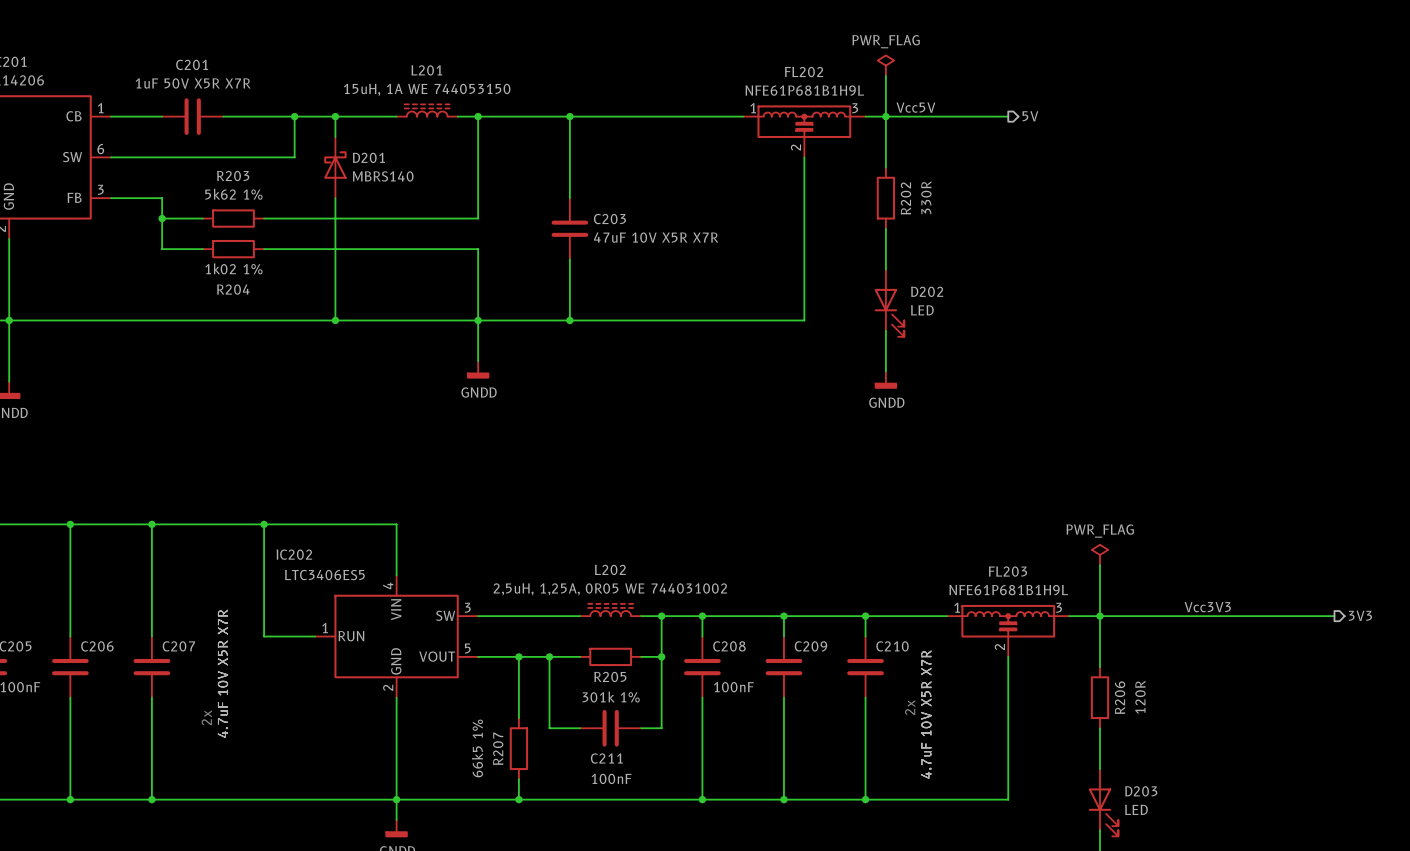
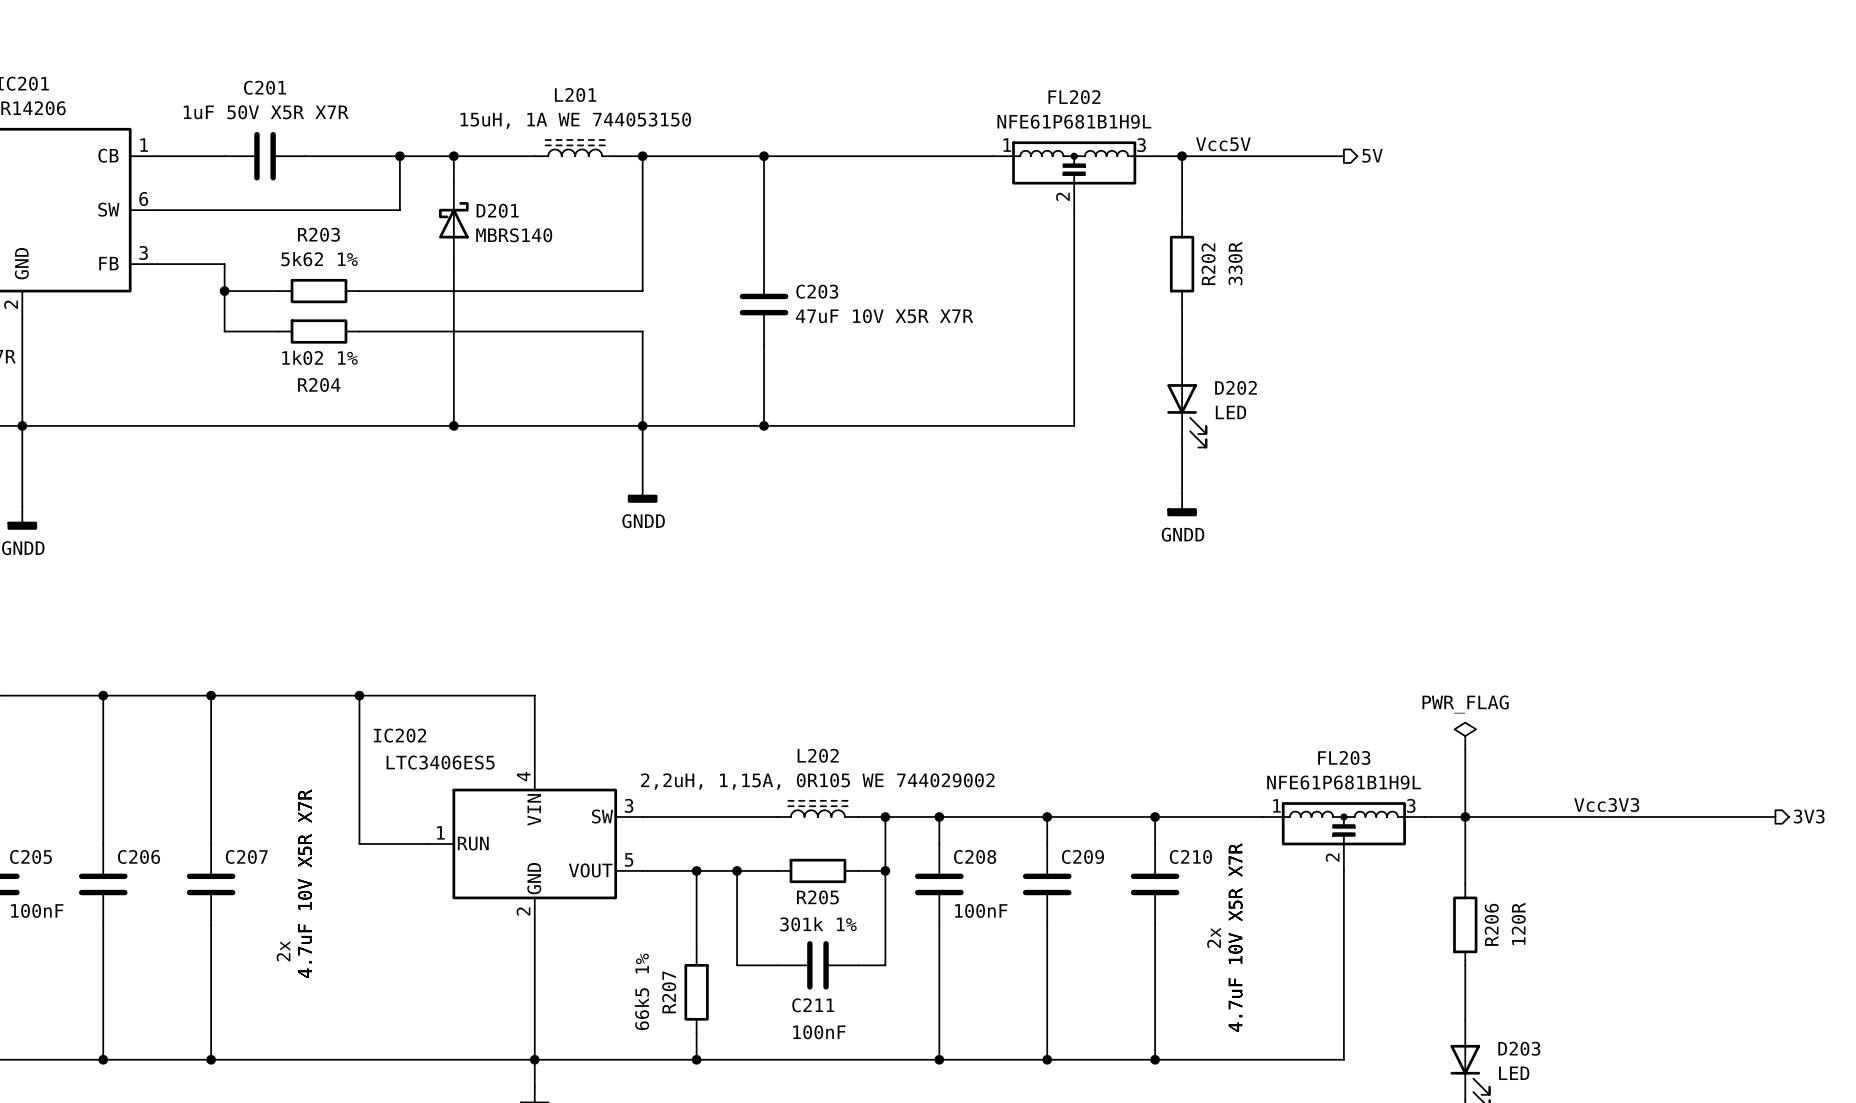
power symbol: PWR_FLAG (885, 65) -> none
wire: (885, 75) (885, 116) -> none
L202 value: 2,5uH, 1,25A, 0R05 WE 744031002 (610, 589) -> 2,2uH, 1,15A, 0R105 WE 744029002 (817, 781)

